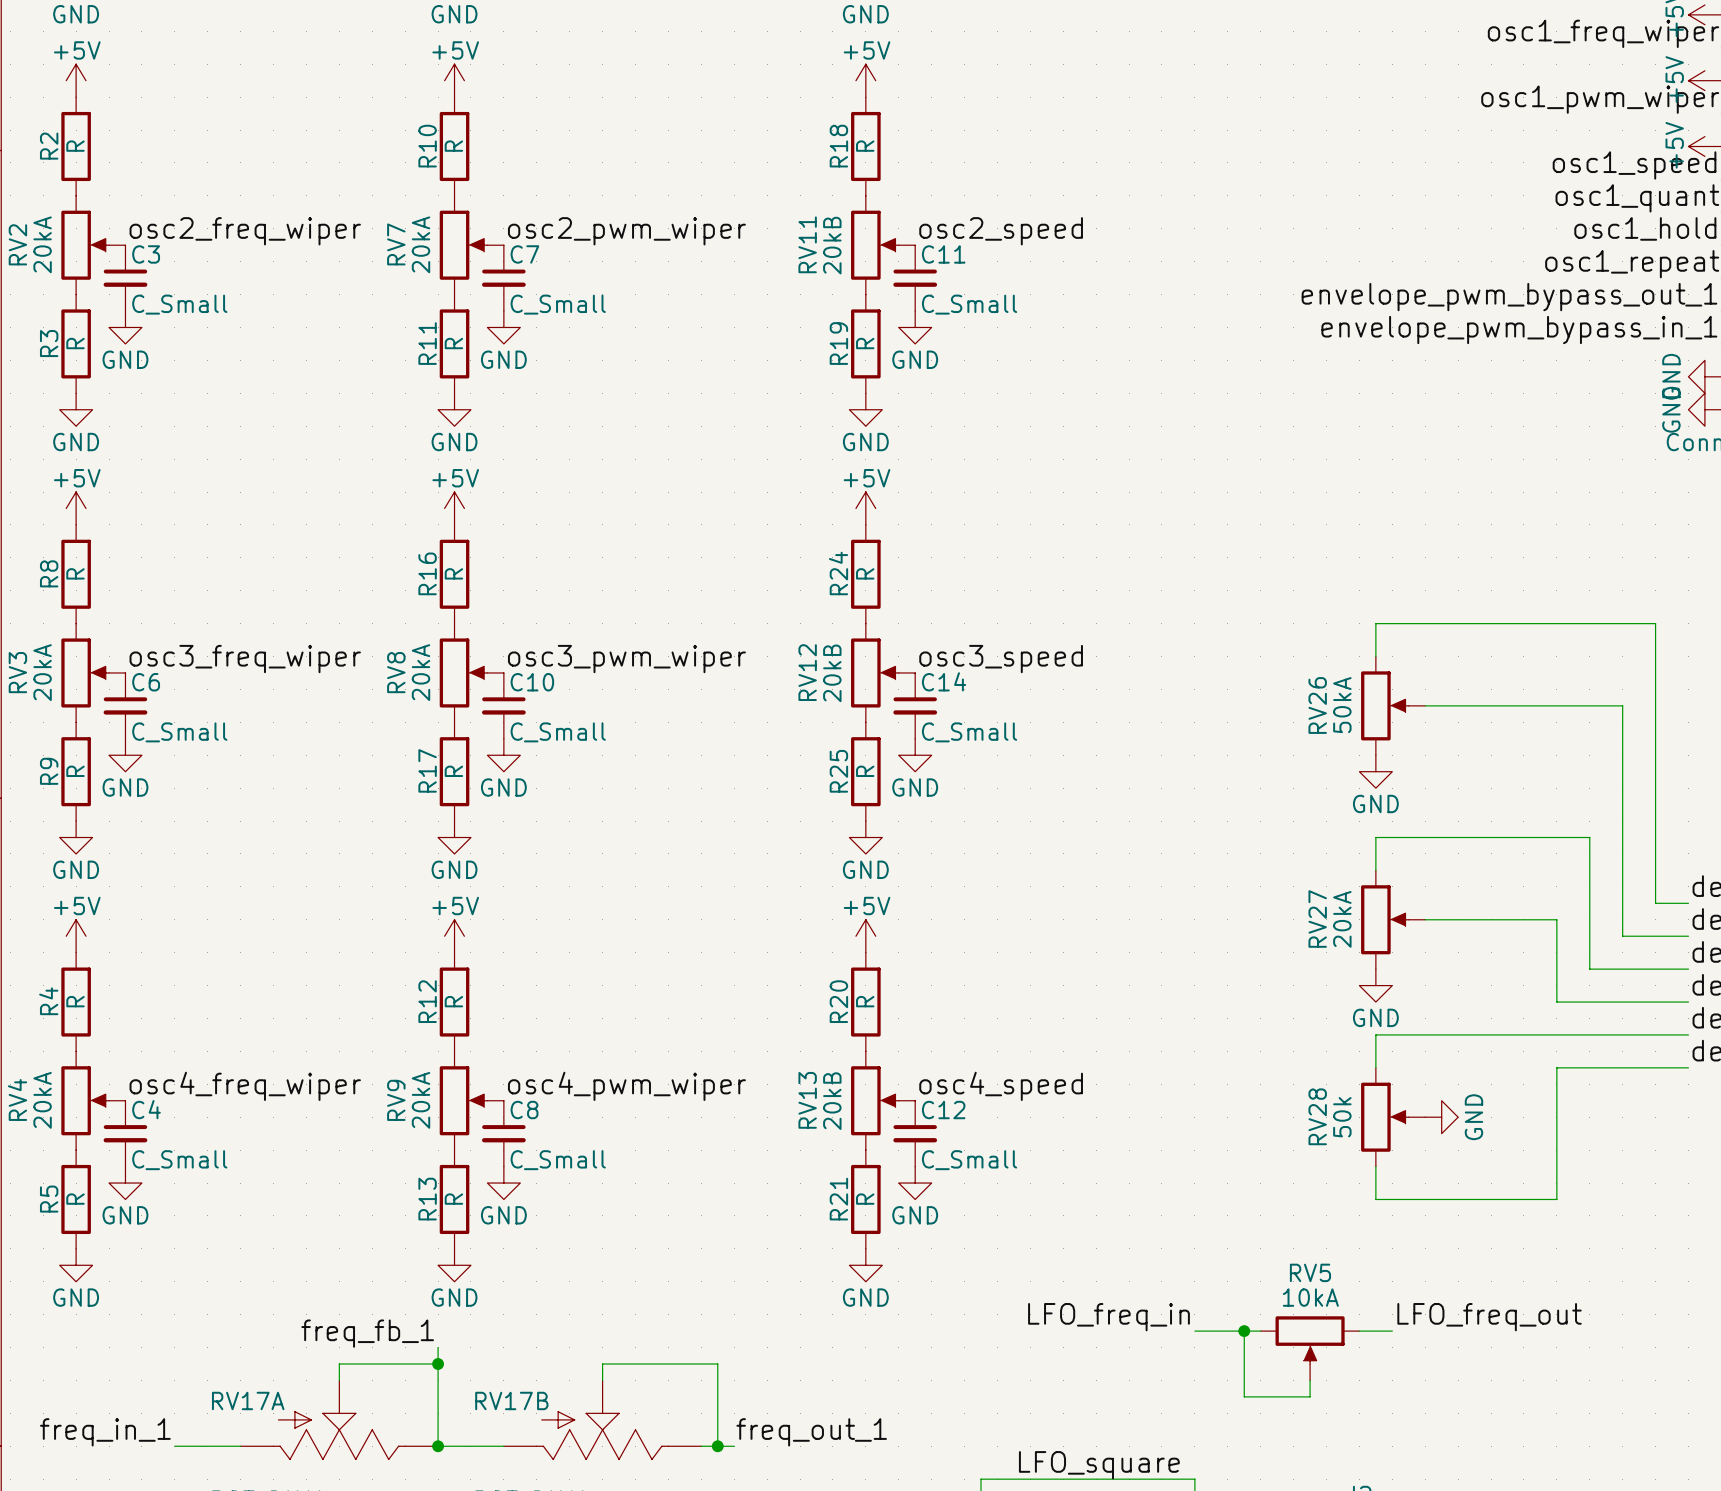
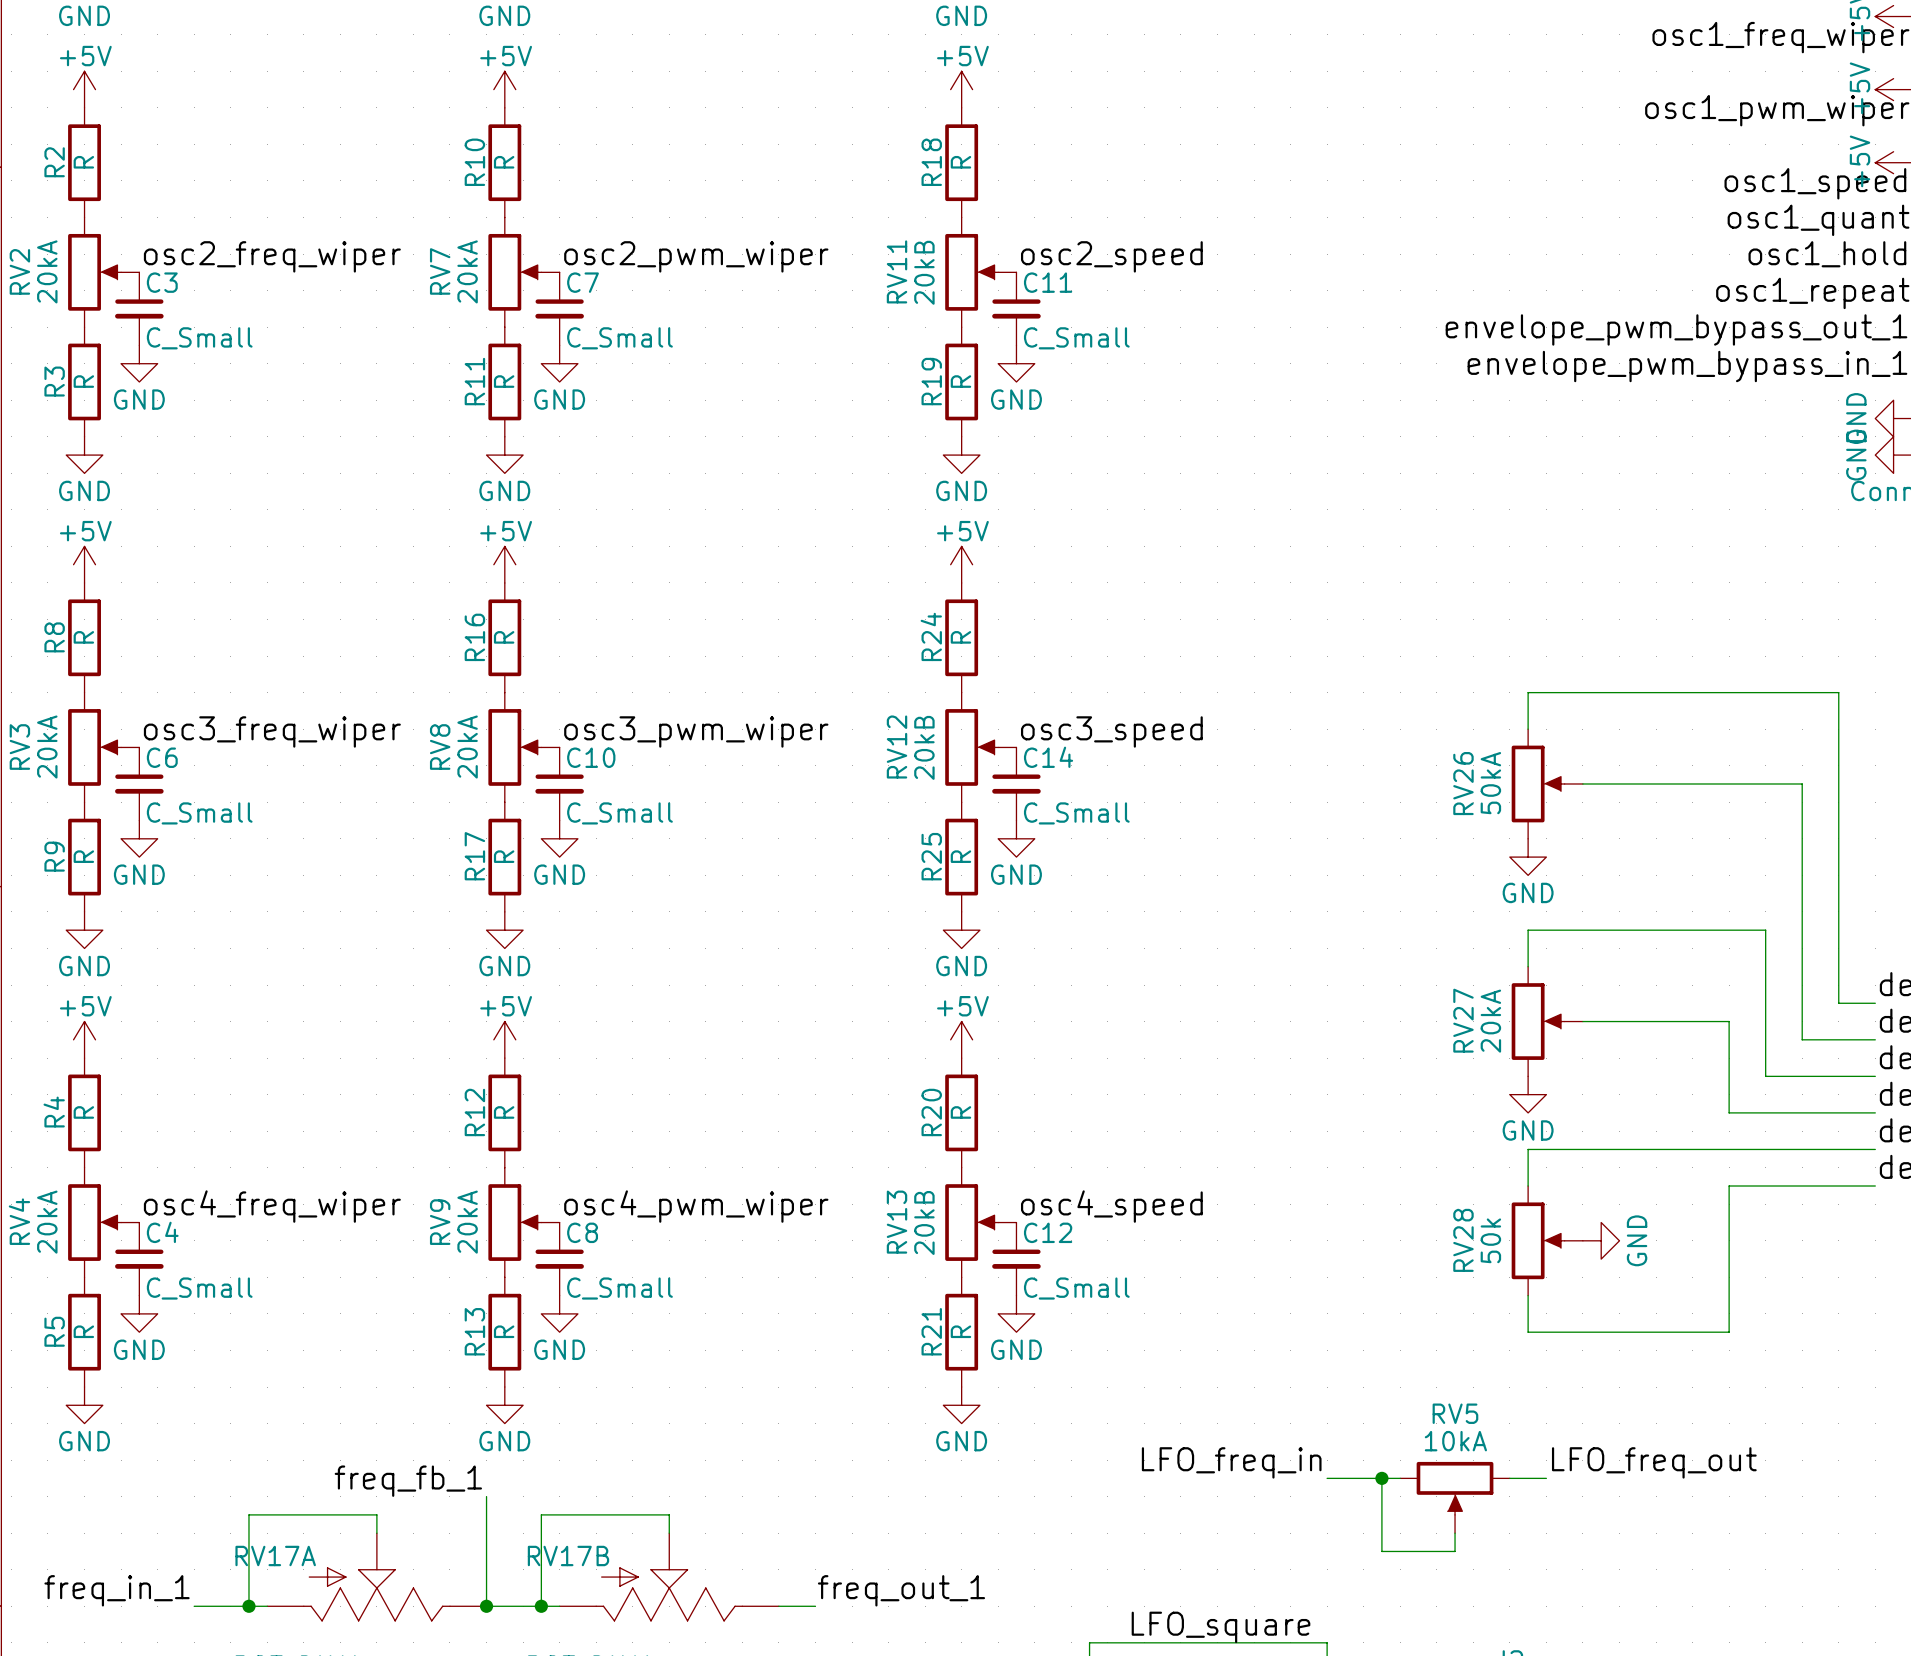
wire: (339, 1364) (438, 1364) -> (376, 1514) (248, 1514) (248, 1606)
junction: (438, 1364) -> none
wire: (602, 1364) (717, 1364) (717, 1446) -> (669, 1514) (541, 1514) (541, 1606)
junction: none -> (248, 1606)
junction: none -> (541, 1606)
junction: (717, 1446) -> none

